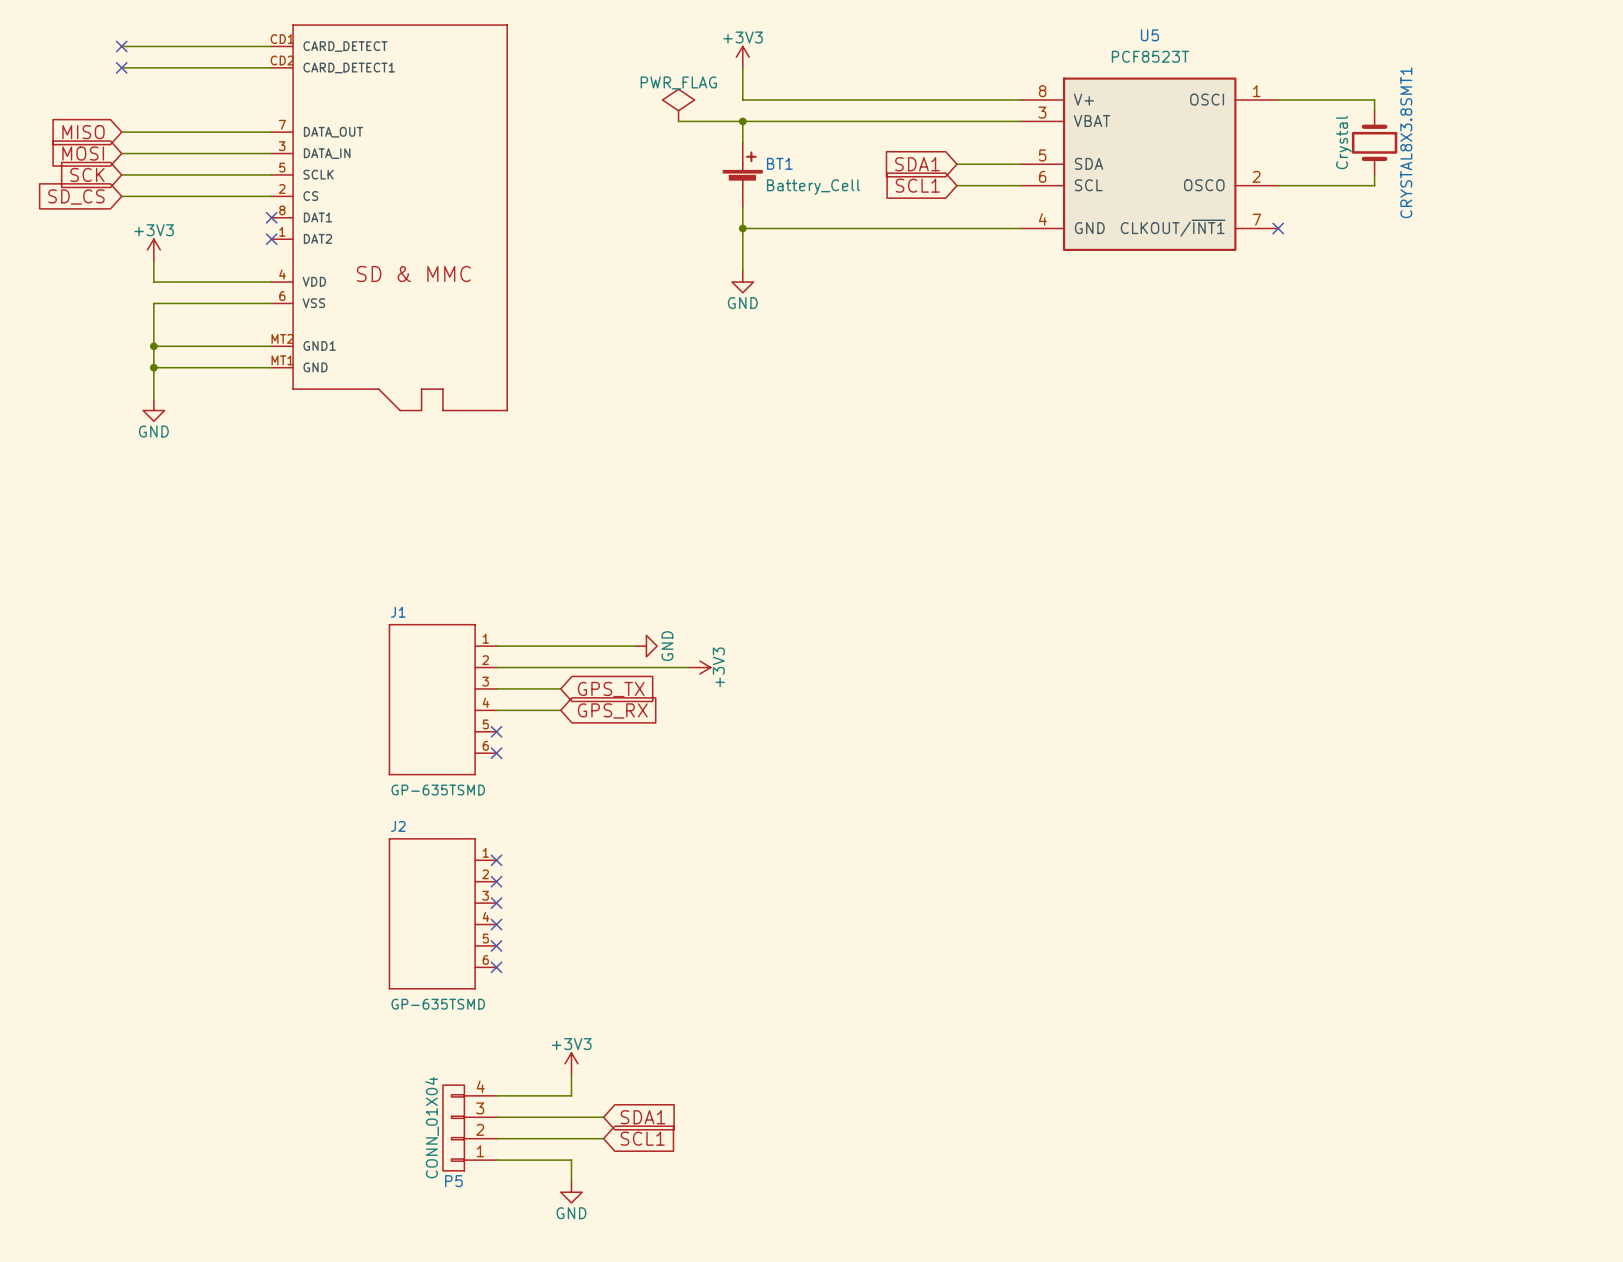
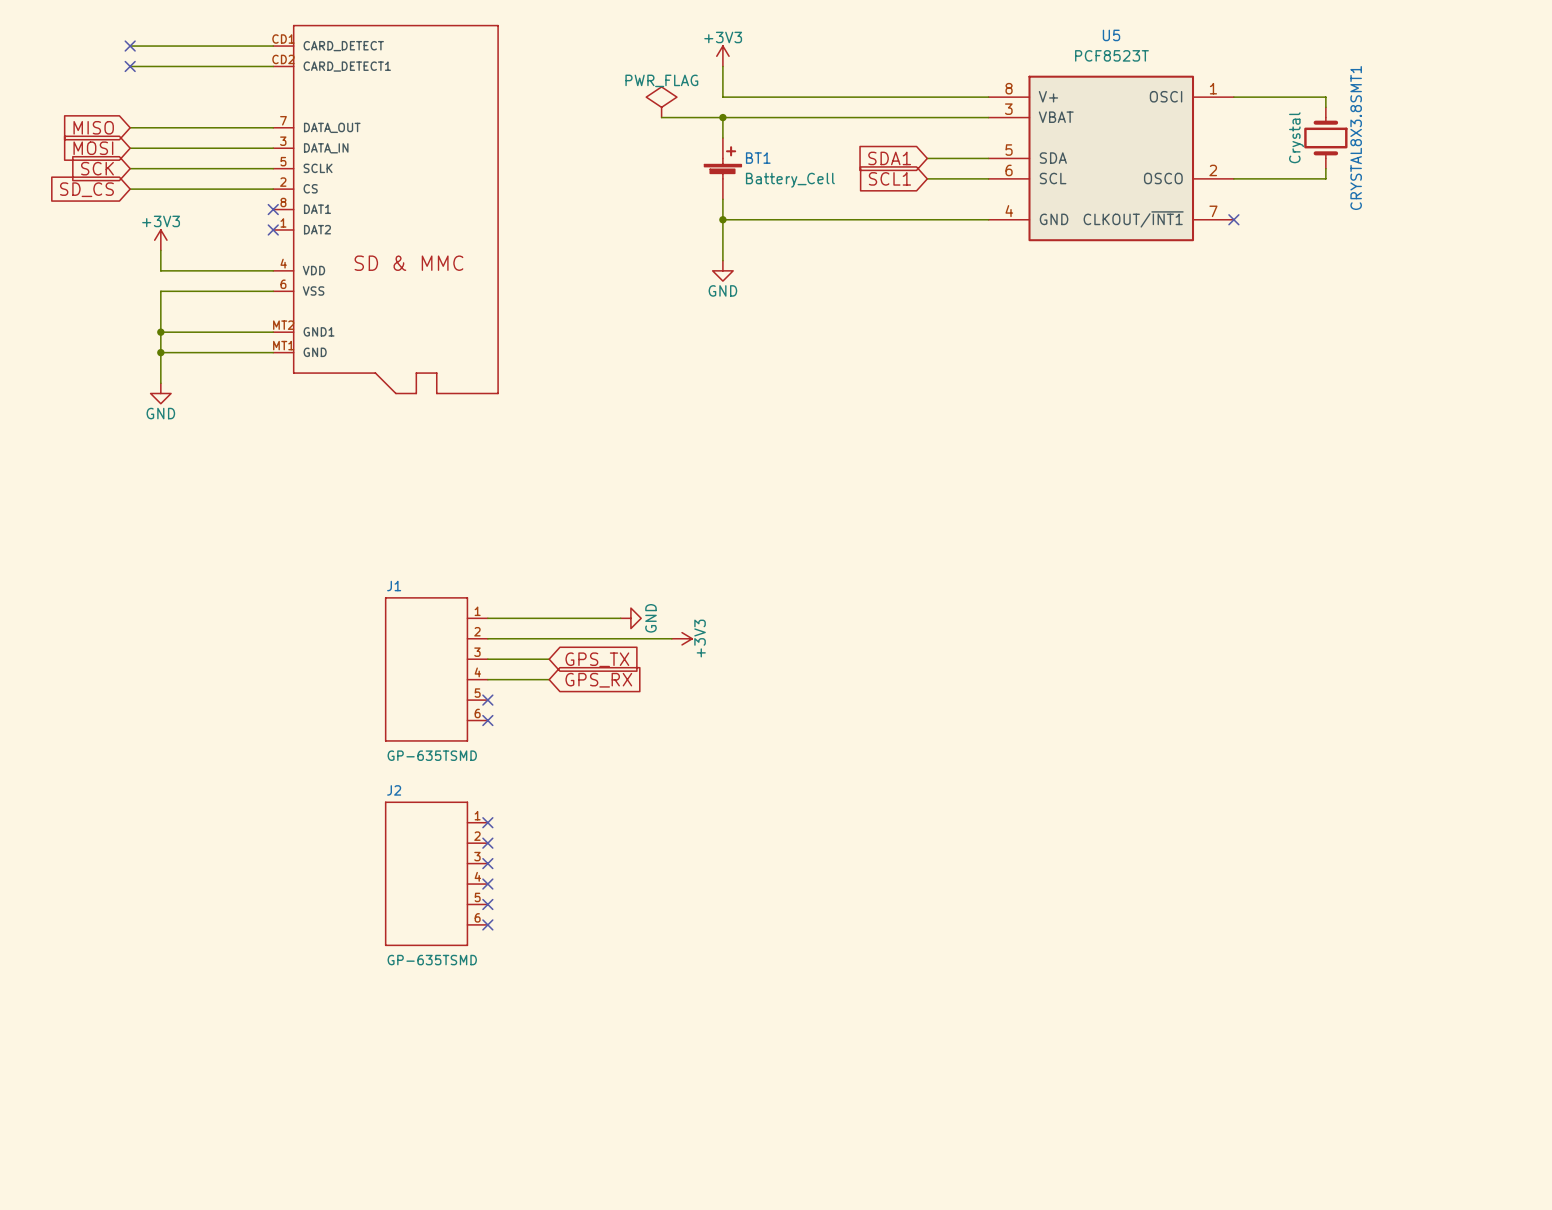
power symbol: +3V3 (571, 1063) -> none
wire: (571, 1074) (571, 1095) (496, 1095) -> none
wire: (496, 1117) (603, 1117) -> none
global label: SDA1 (643, 1117) -> none
P5: CONN_01X04 (469, 1127) -> none
wire: (496, 1138) (603, 1138) -> none
global label: SCL1 (642, 1138) -> none
wire: (496, 1160) (571, 1160) (571, 1181) -> none
power symbol: GND (571, 1192) -> none

